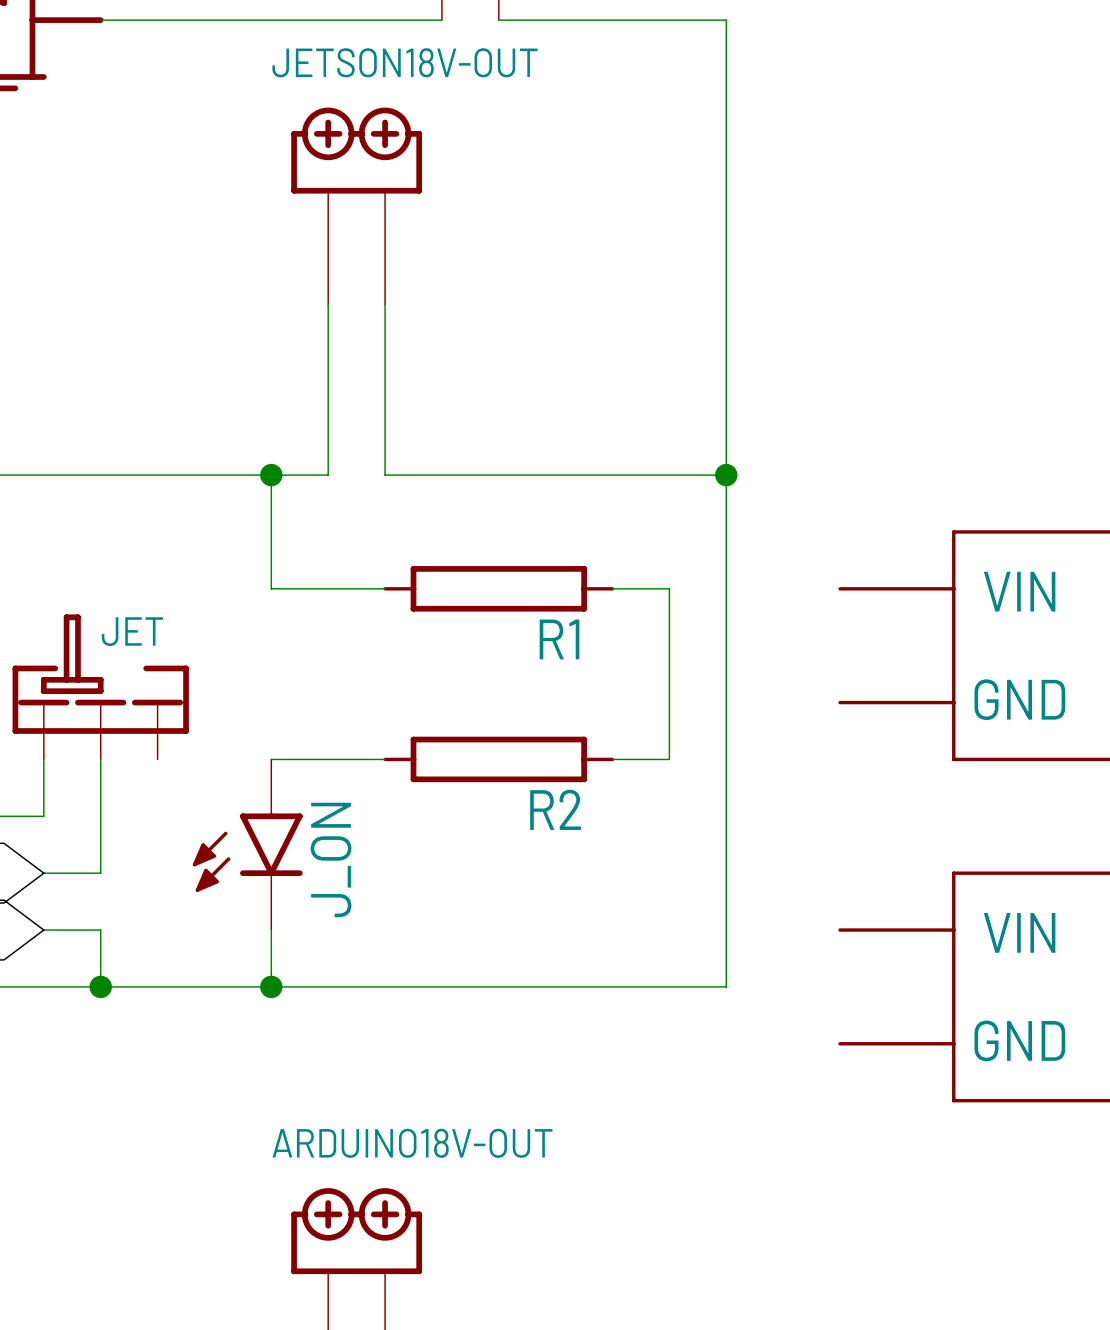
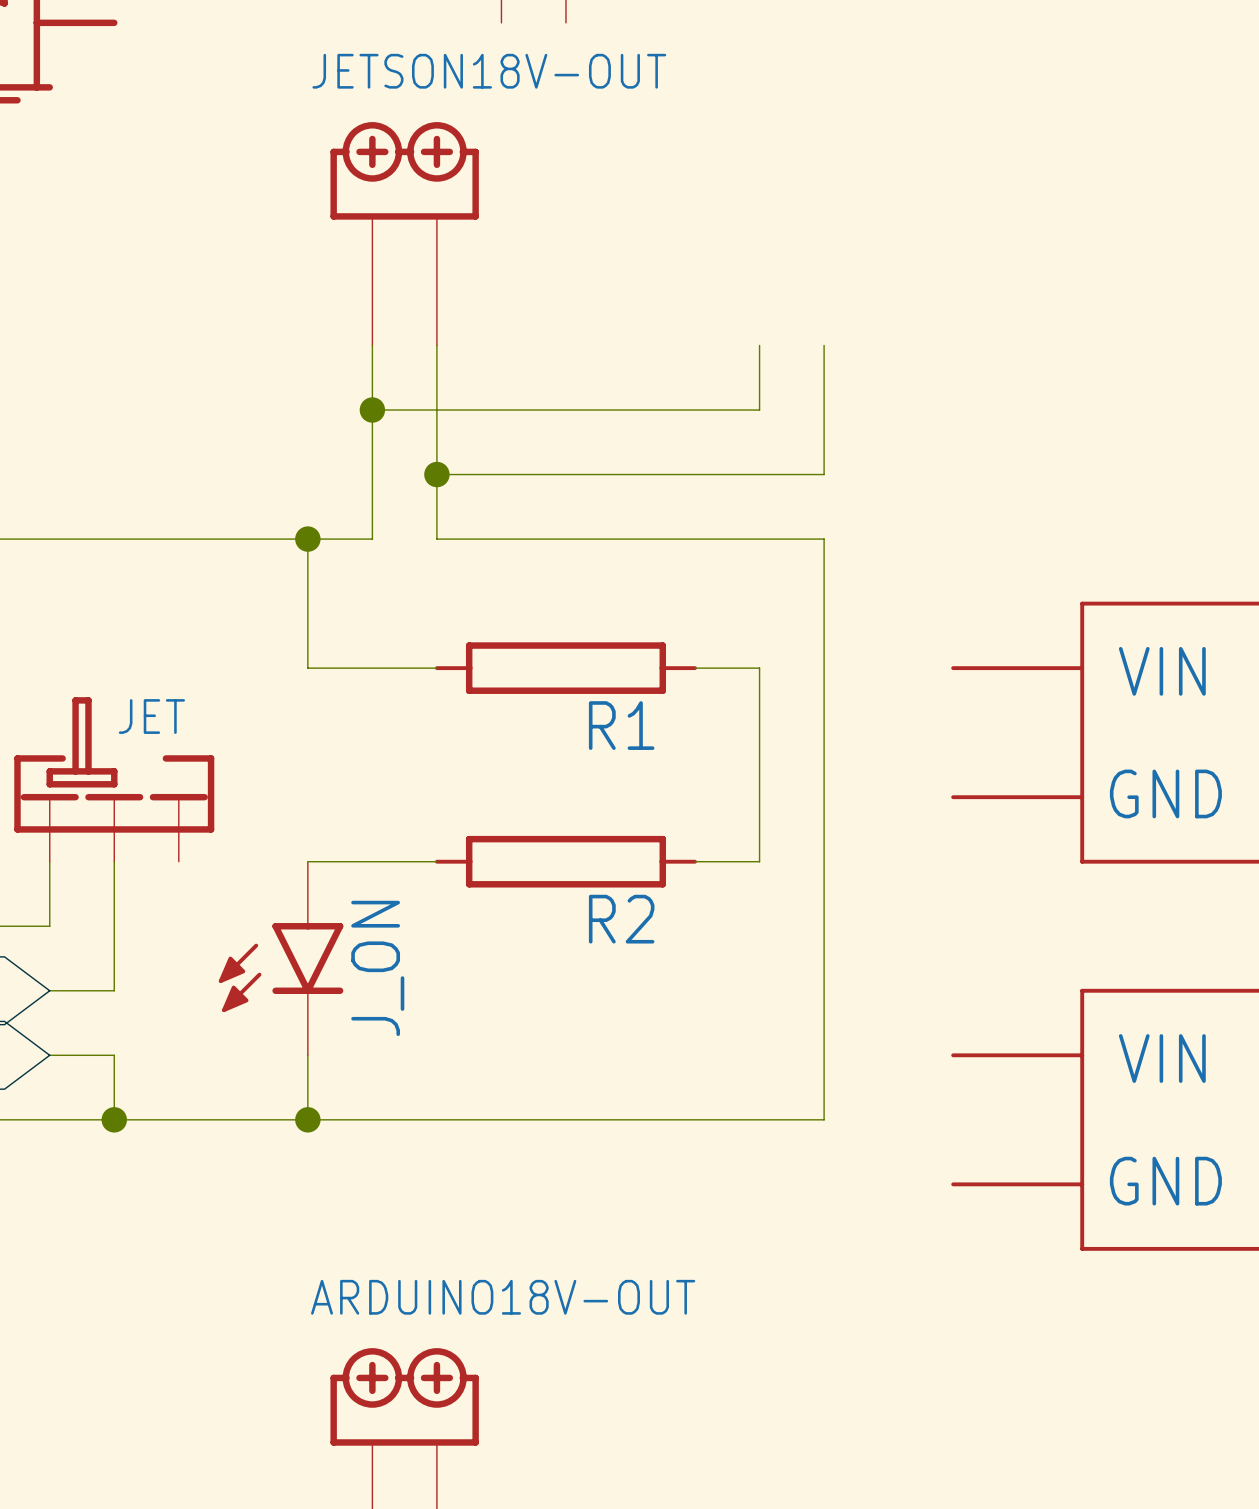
wire: (100, 20) (441, 20) -> none
wire: (498, 20) (726, 20) (726, 304) -> none
wire: none -> (759, 345) (759, 410) (372, 410)
junction: none -> (372, 410)
junction: none -> (436, 474)
wire: (726, 418) (726, 475) -> (824, 474) (436, 474)
junction: (726, 475) -> none

